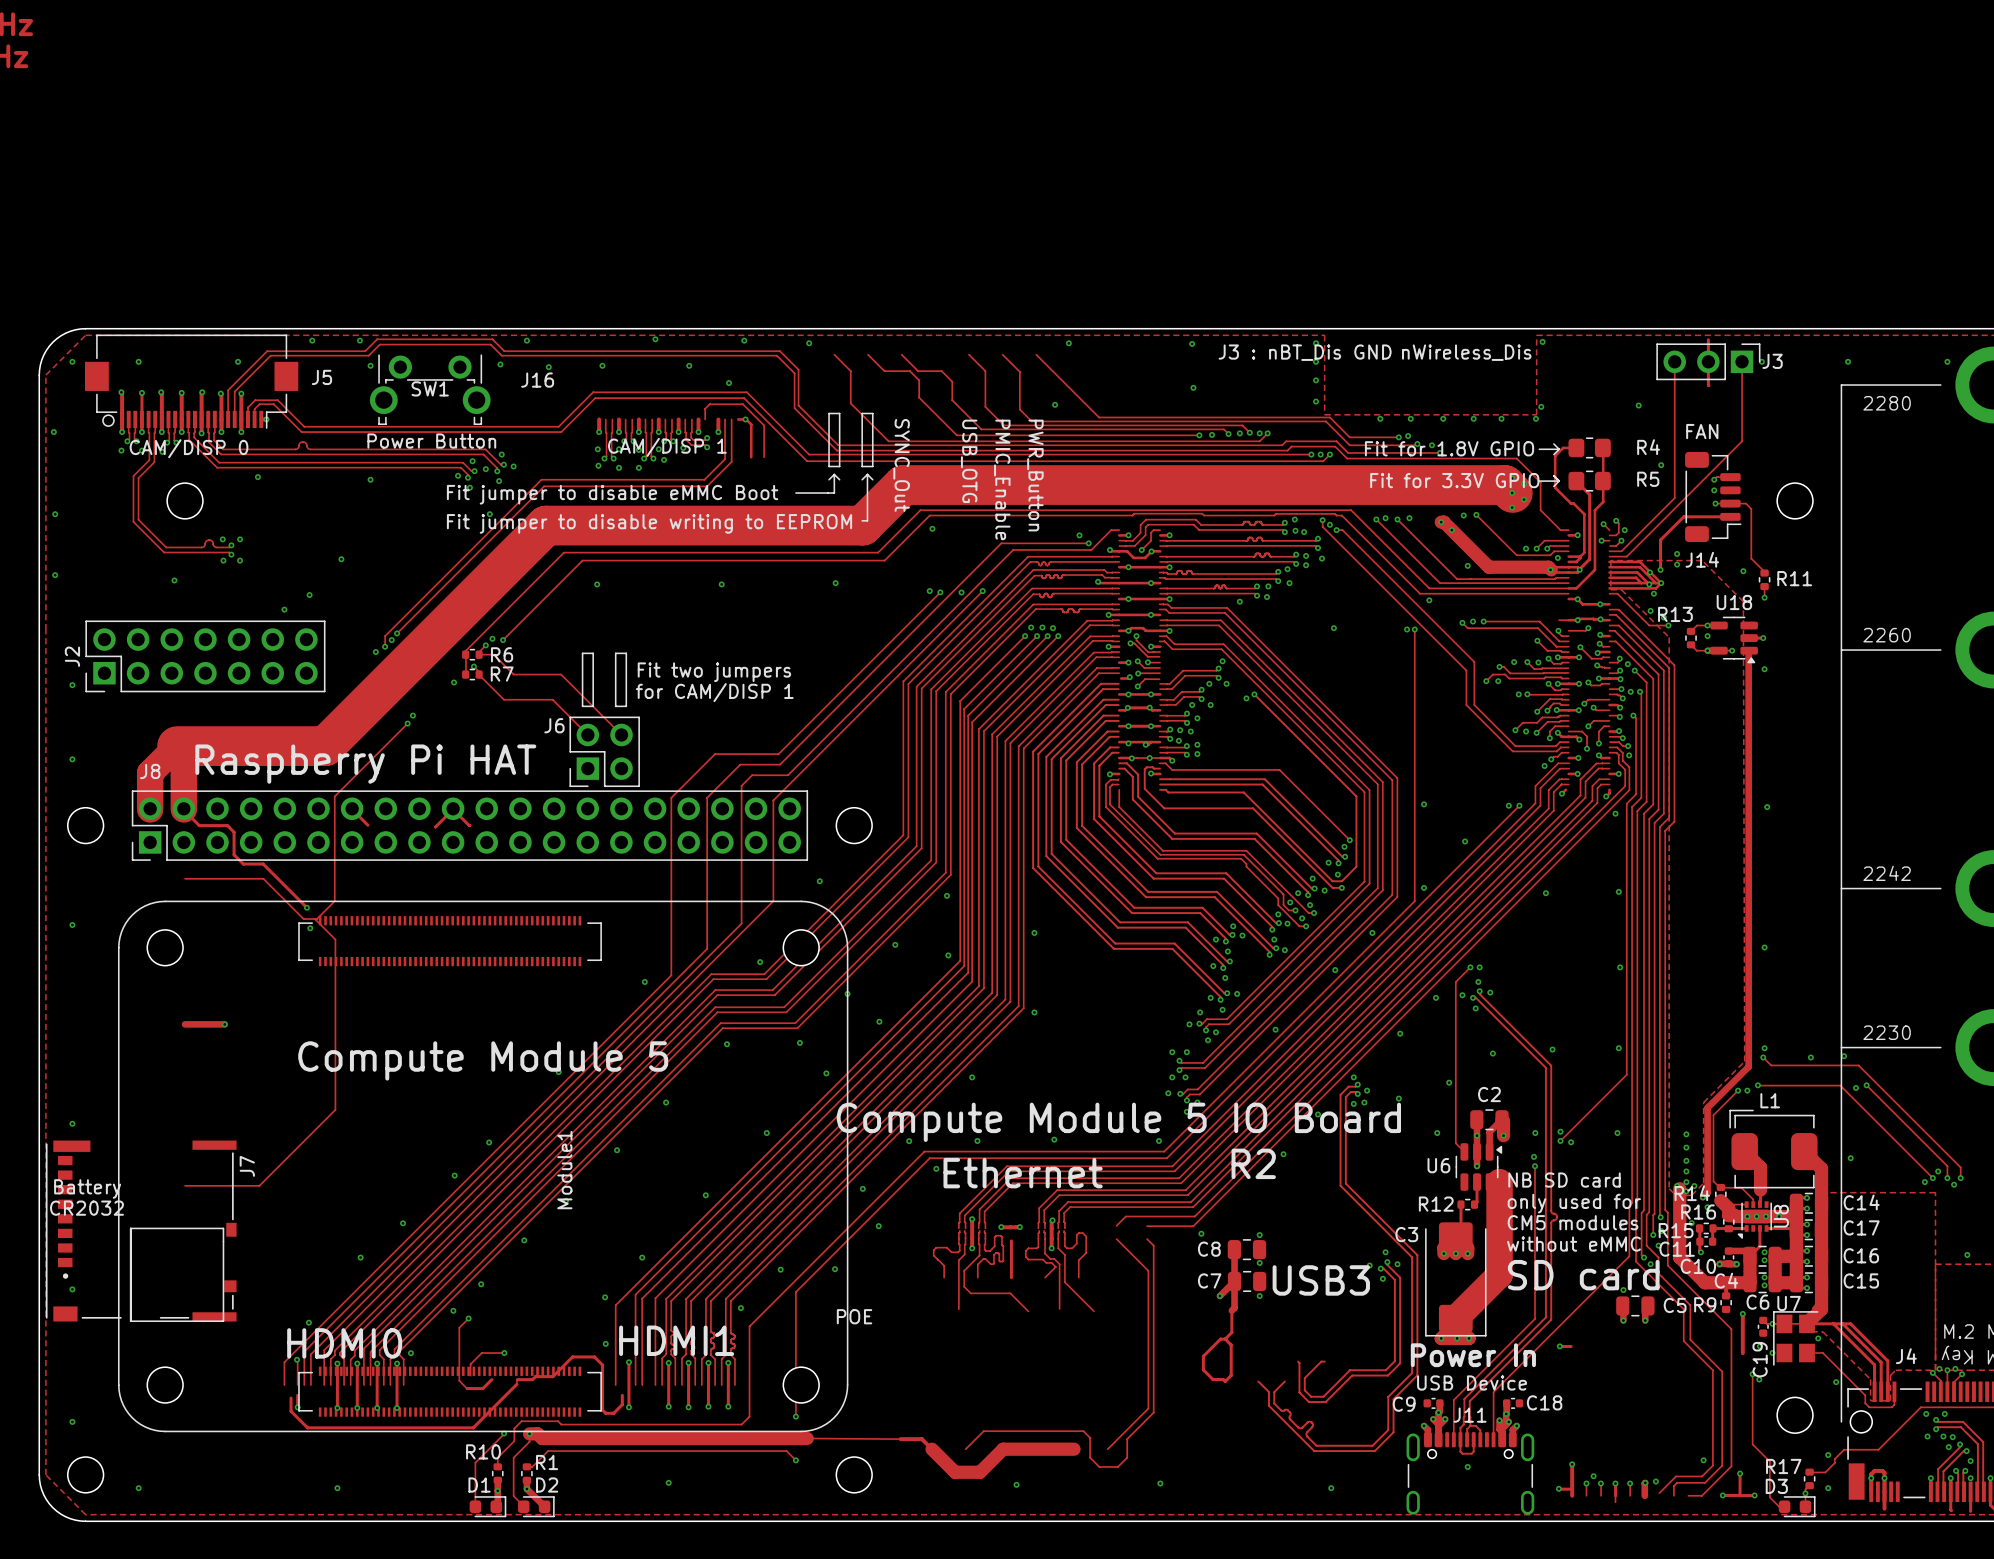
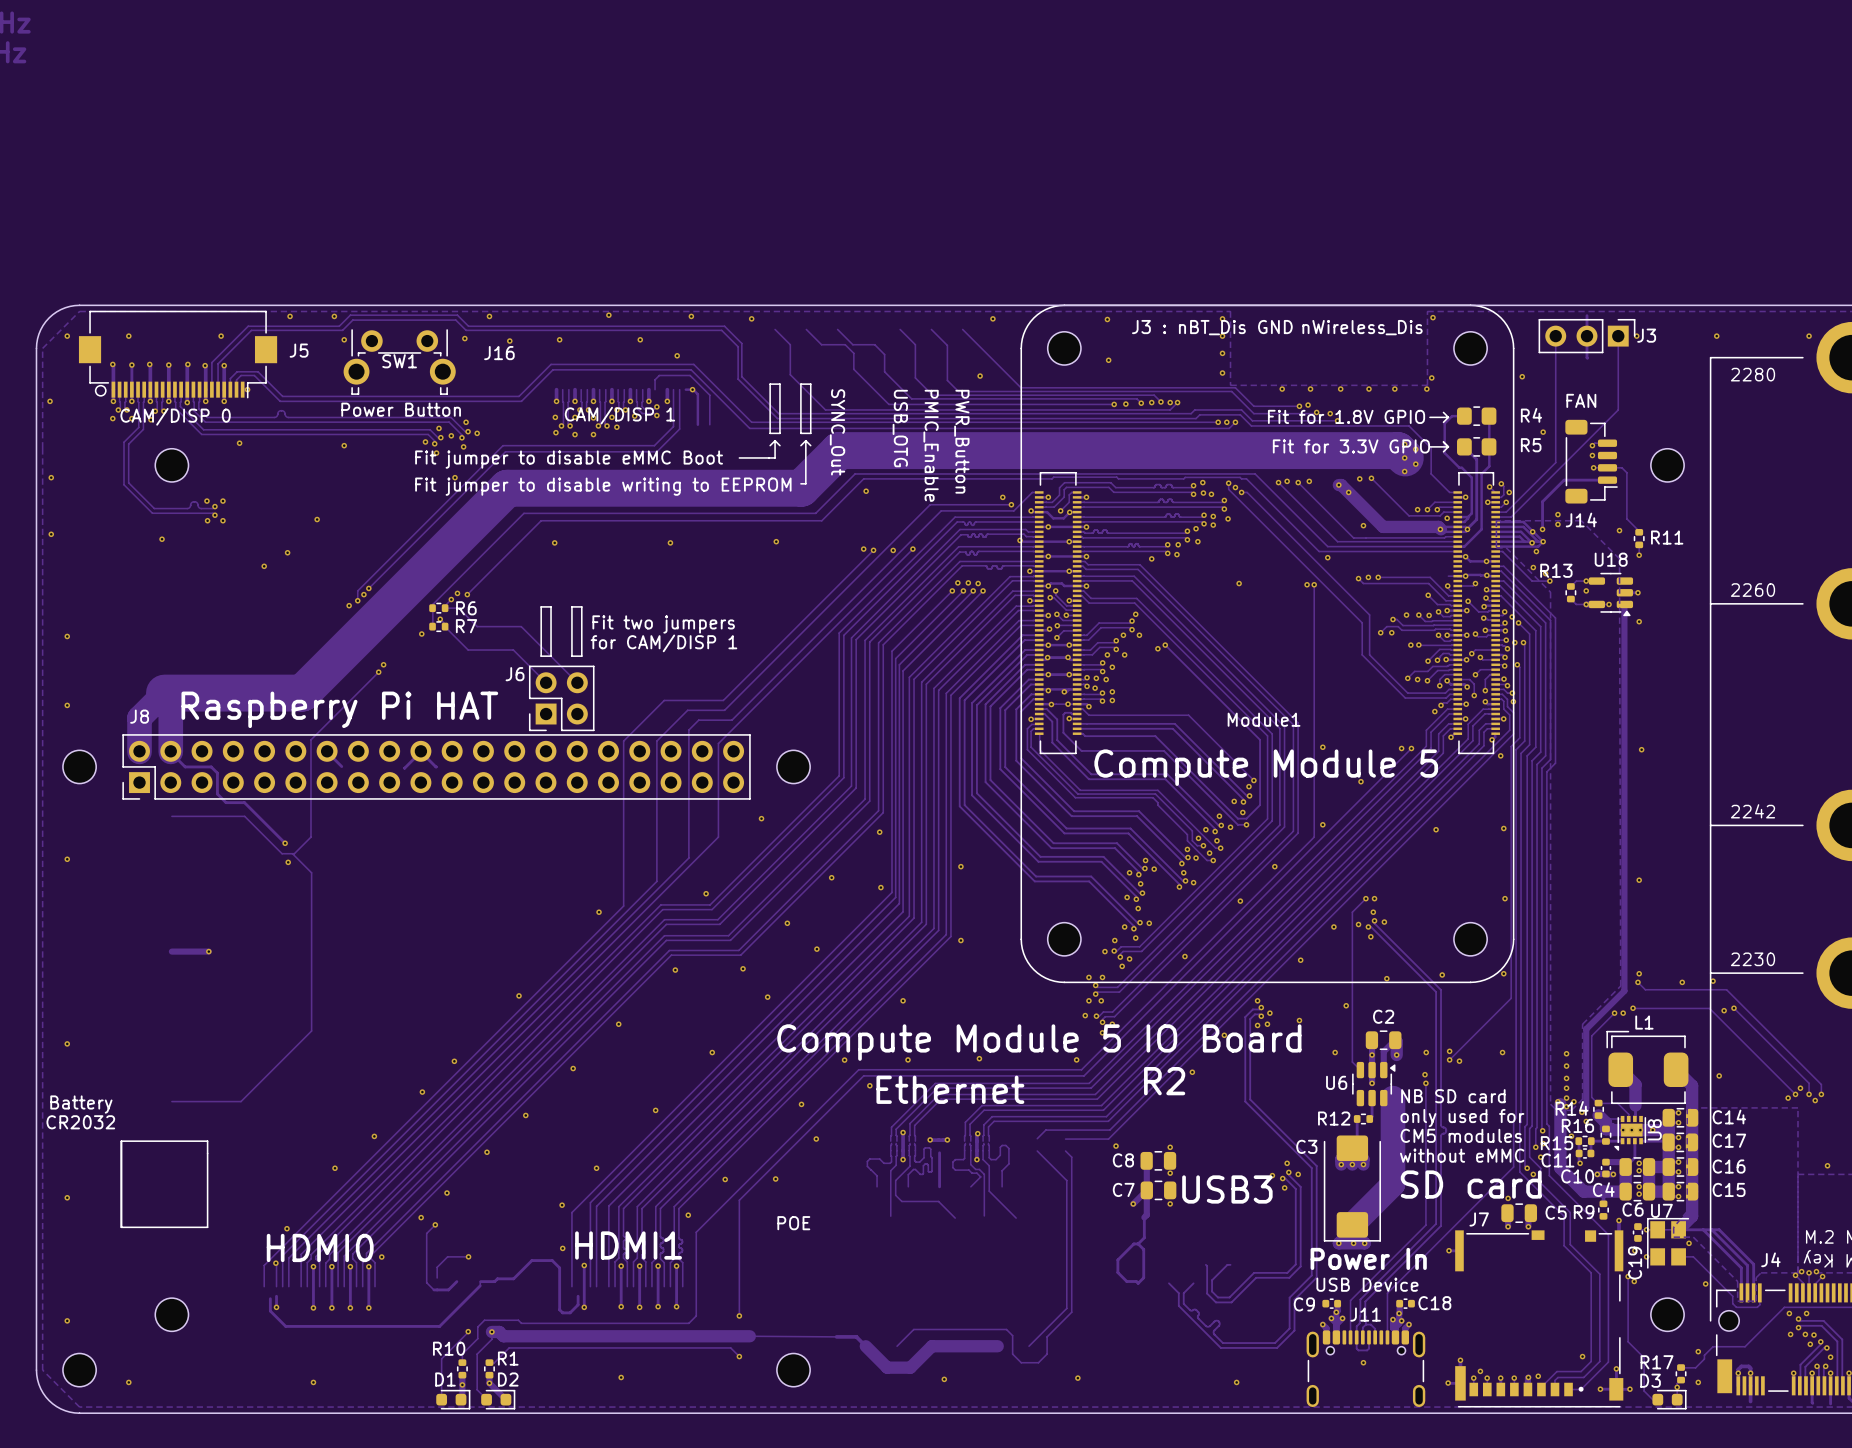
J2: (205, 656) -> none
text: none -> Compute Module 5 (1266, 767)
text: Compute Module 5 (483, 1060) -> none
Module1 rotation: 0° (483, 1166) -> 90° clockwise (1267, 643)
Module1 position: (483, 1166) -> (1267, 643)
J7 rotation: 0° (141, 1231) -> 90° counterclockwise (1539, 1318)
J7 position: (141, 1231) -> (1539, 1318)
part: none -> (171, 1314)

